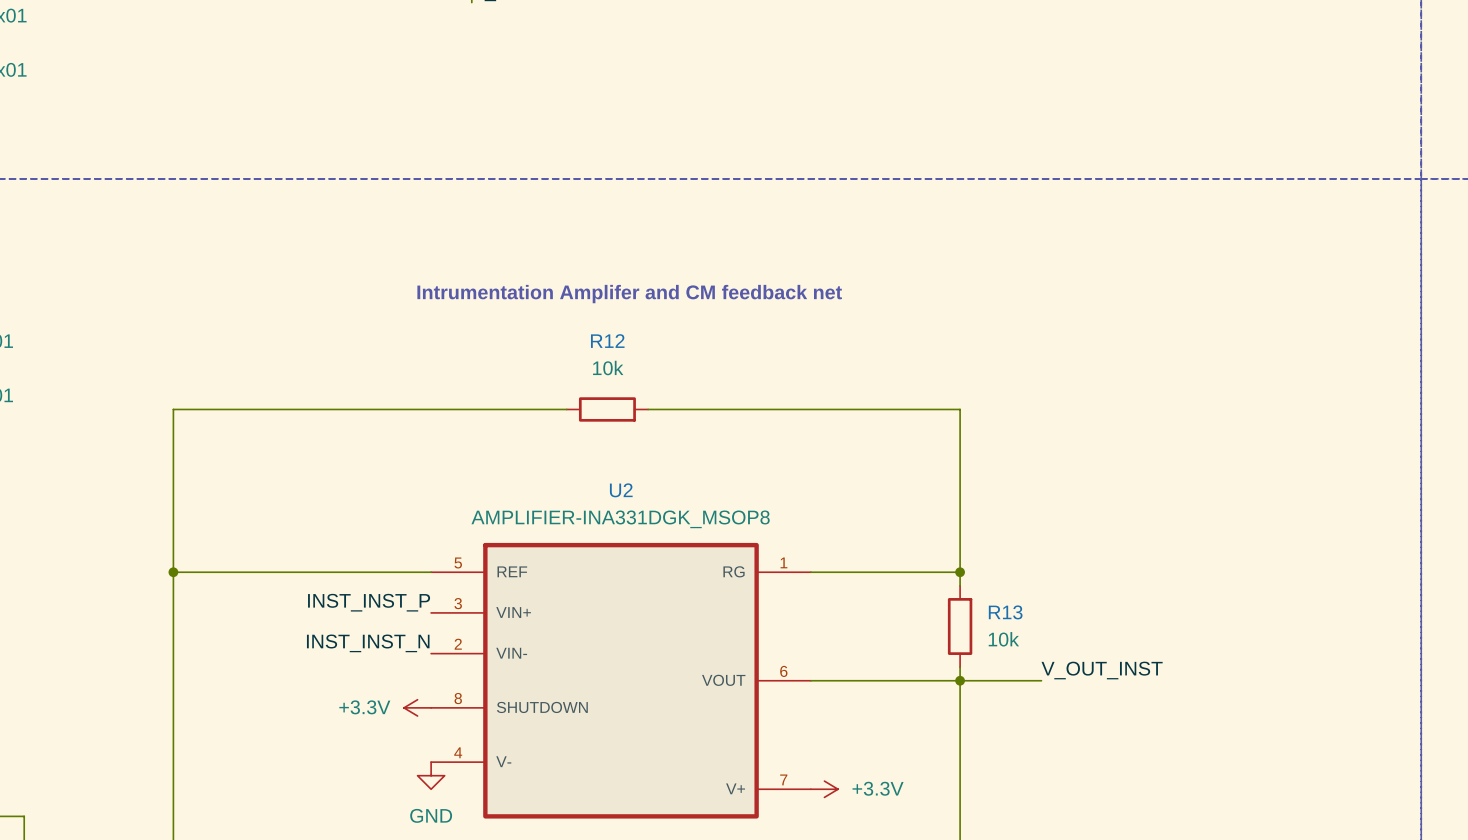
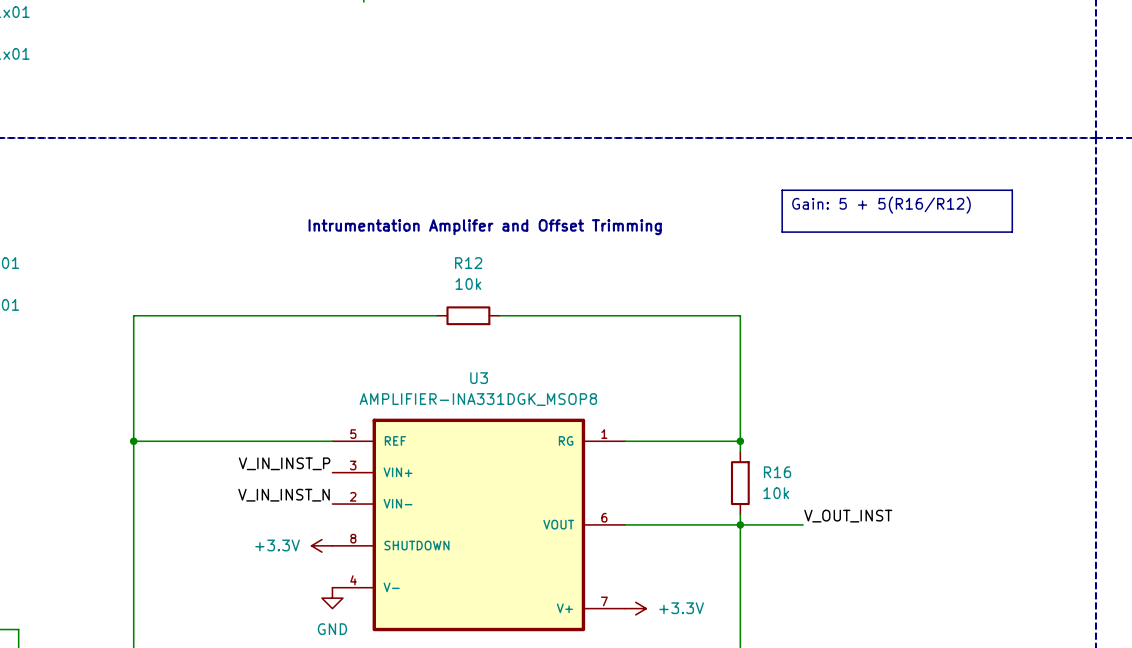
line: none -> (782, 190) (1012, 190) (1012, 232) (782, 232) (782, 190)
text: none -> Gain: 5 + 5(R16/R12) (881, 205)
text: Intrumentation Amplifer and CM feedback net (629, 294) -> Intrumentation Amplifer and Offset Trimming (485, 227)
U2 name: U2 (621, 490) -> U3 (479, 378)
label: INST_INST_P (369, 602) -> V_IN_INST_P (284, 463)
R13 name: R13 (1005, 612) -> R16 (777, 472)
label: INST_INST_N (368, 643) -> V_IN_INST_N (284, 495)

